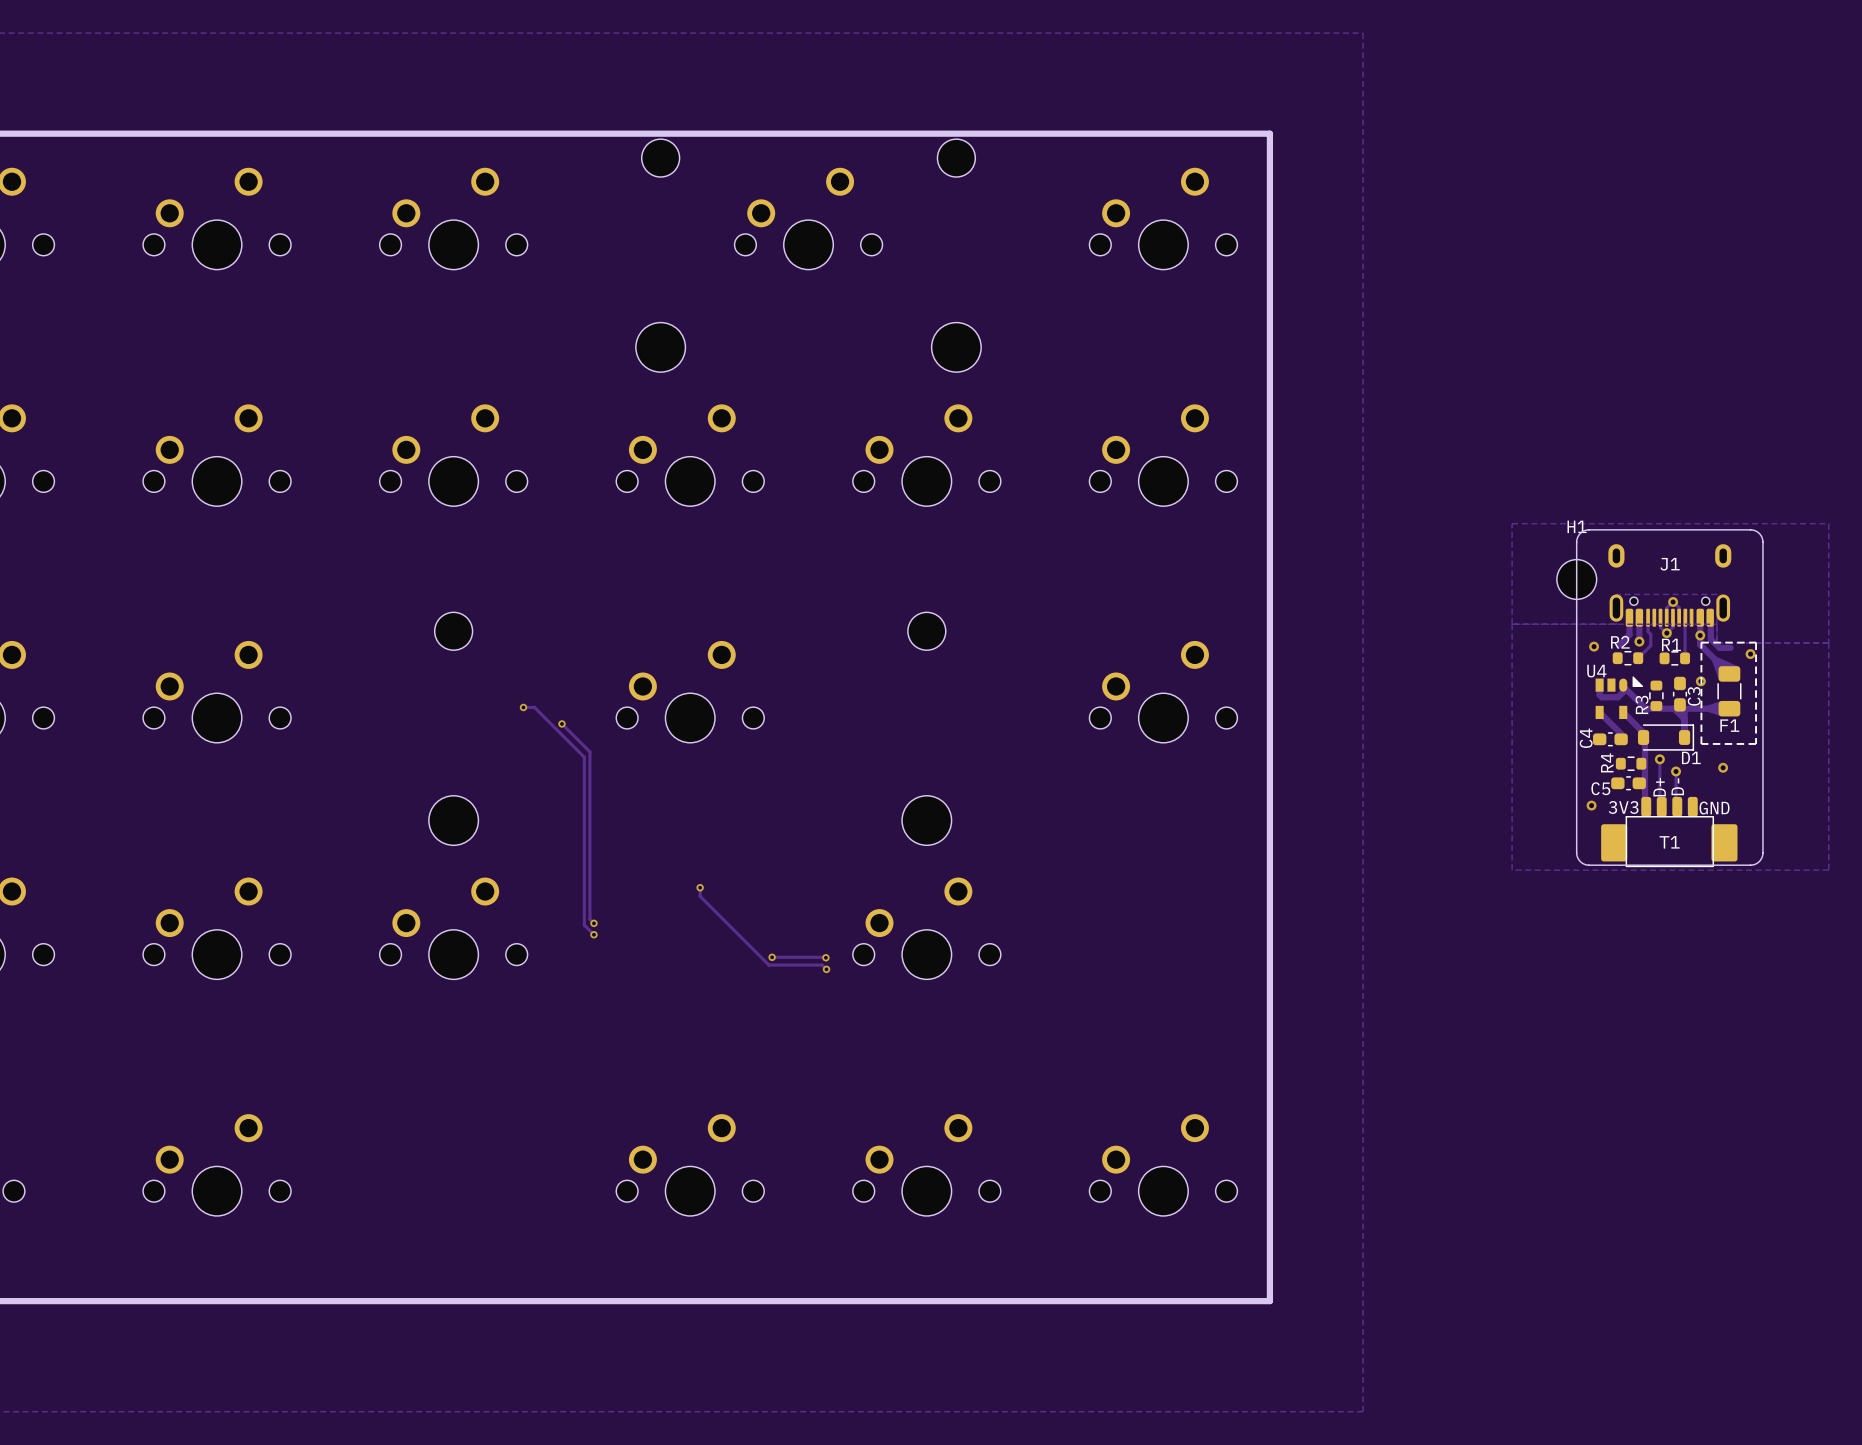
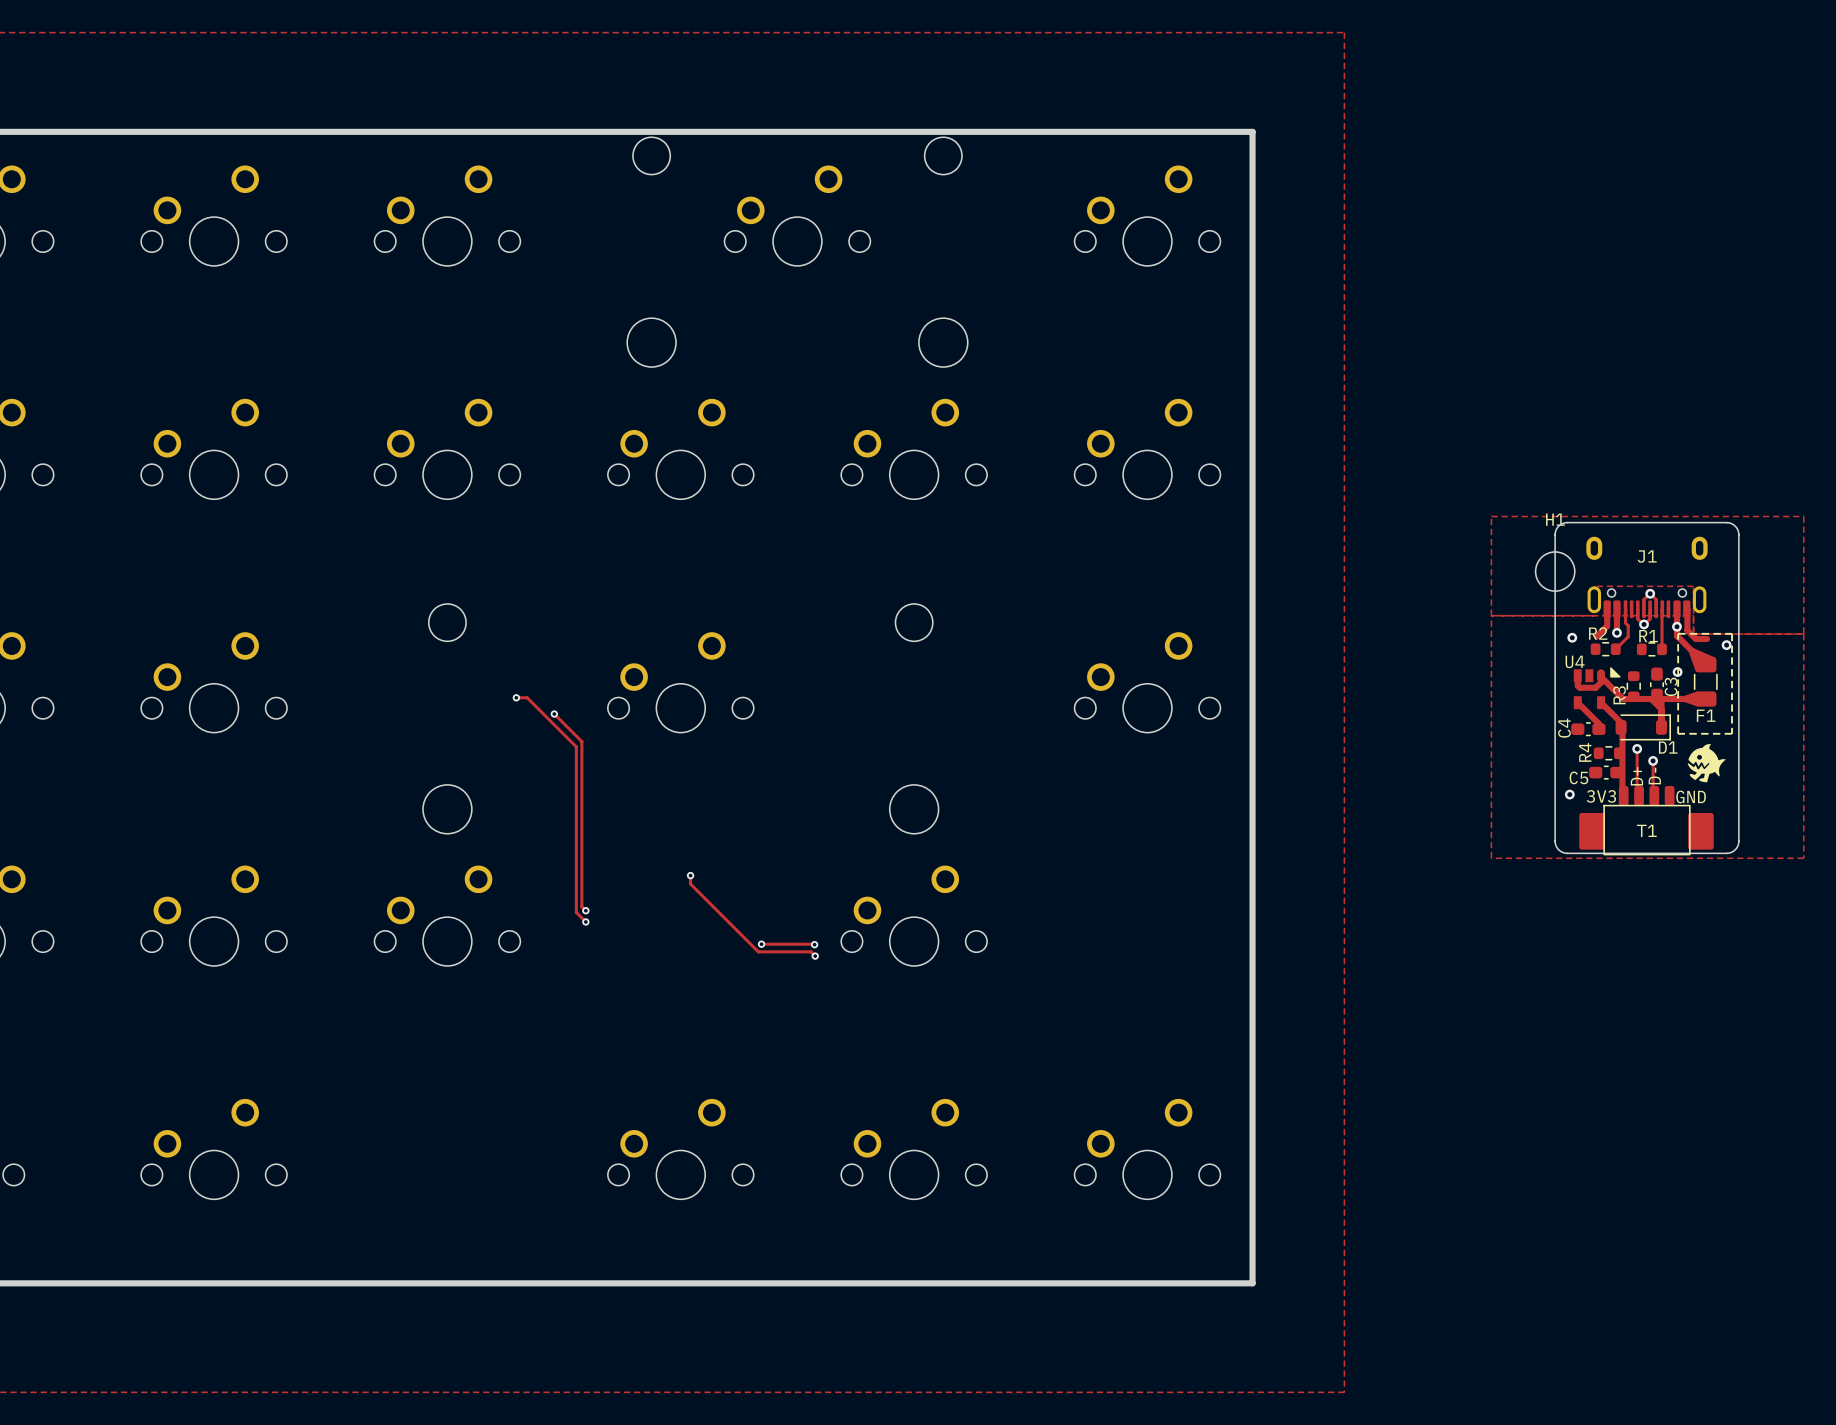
drawing: none -> [1687, 744, 1726, 783]

